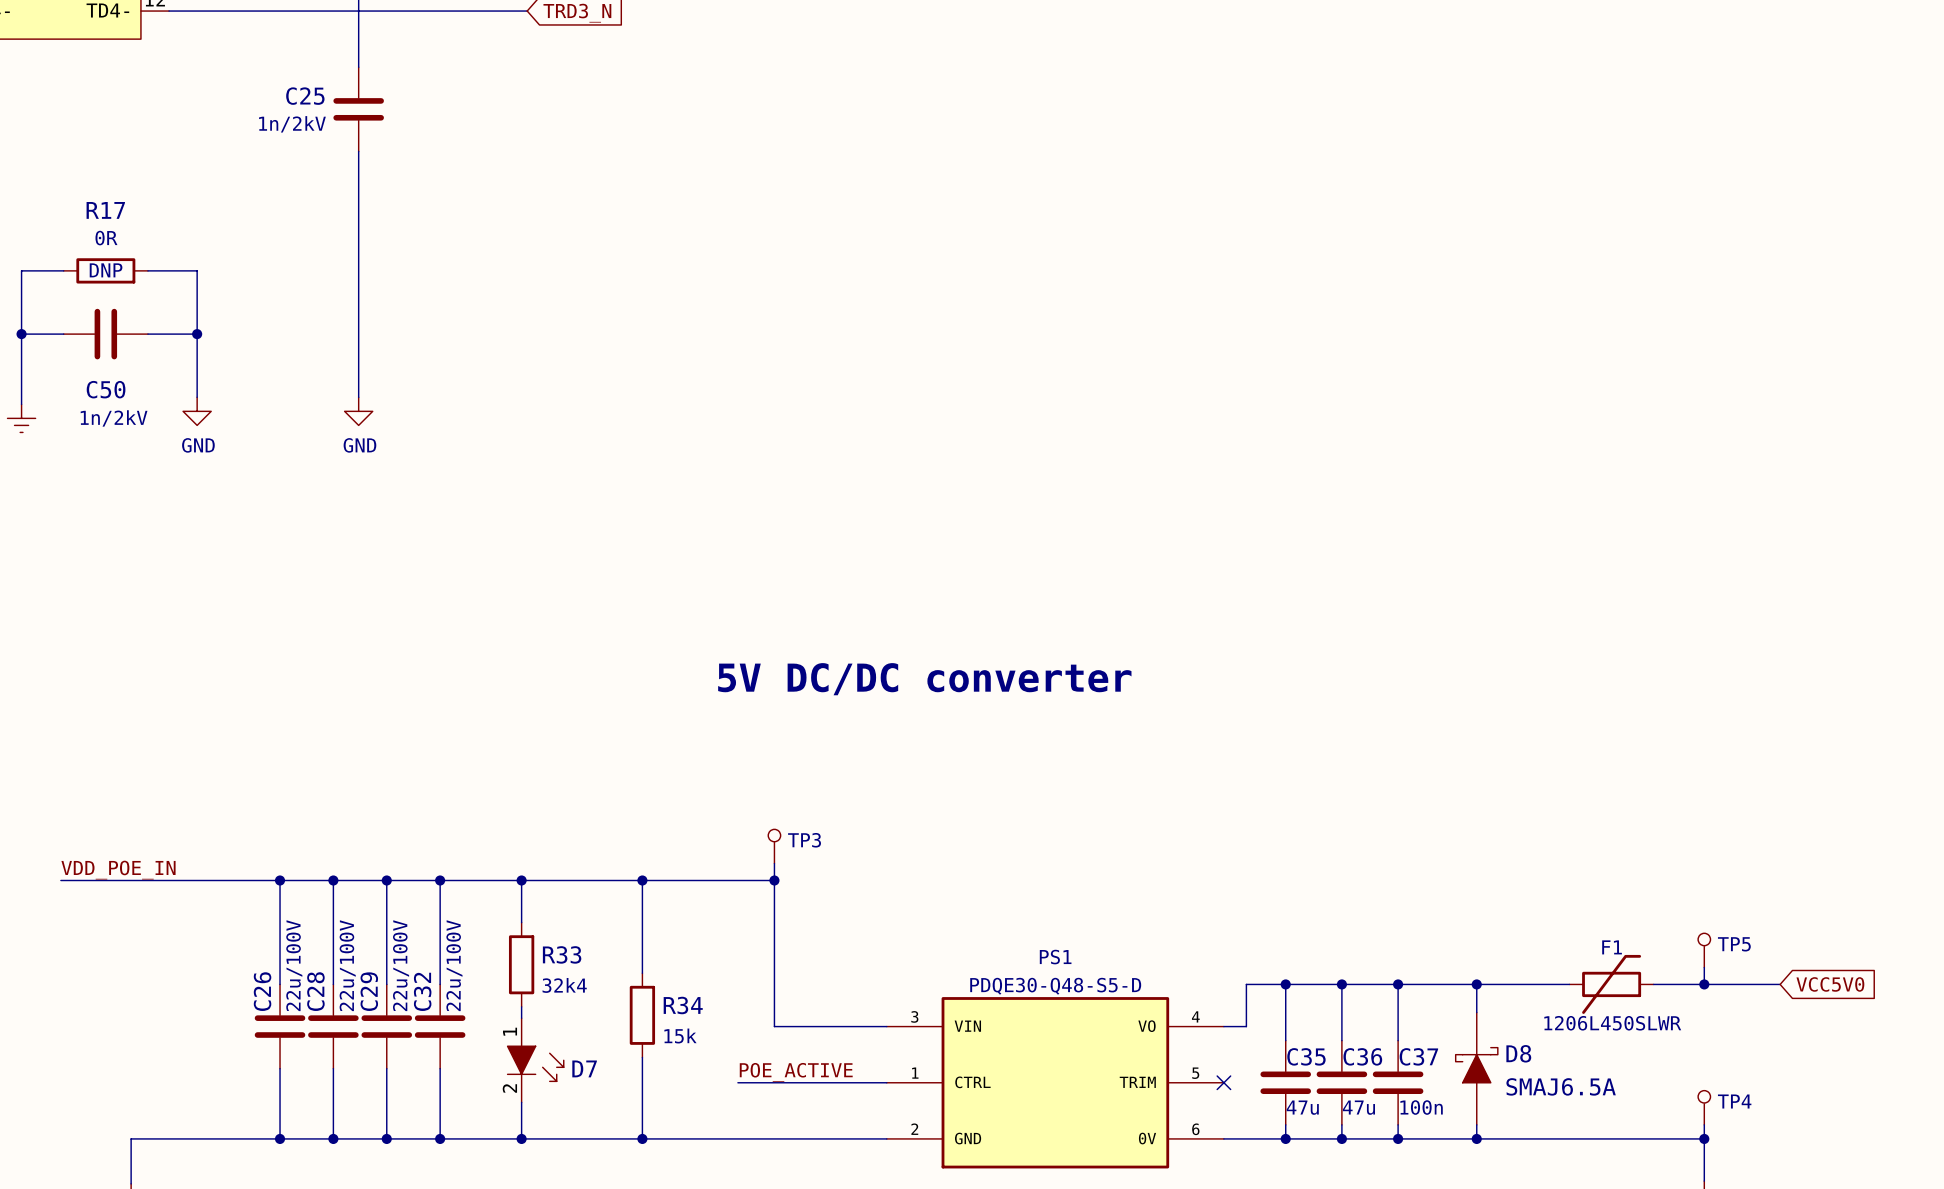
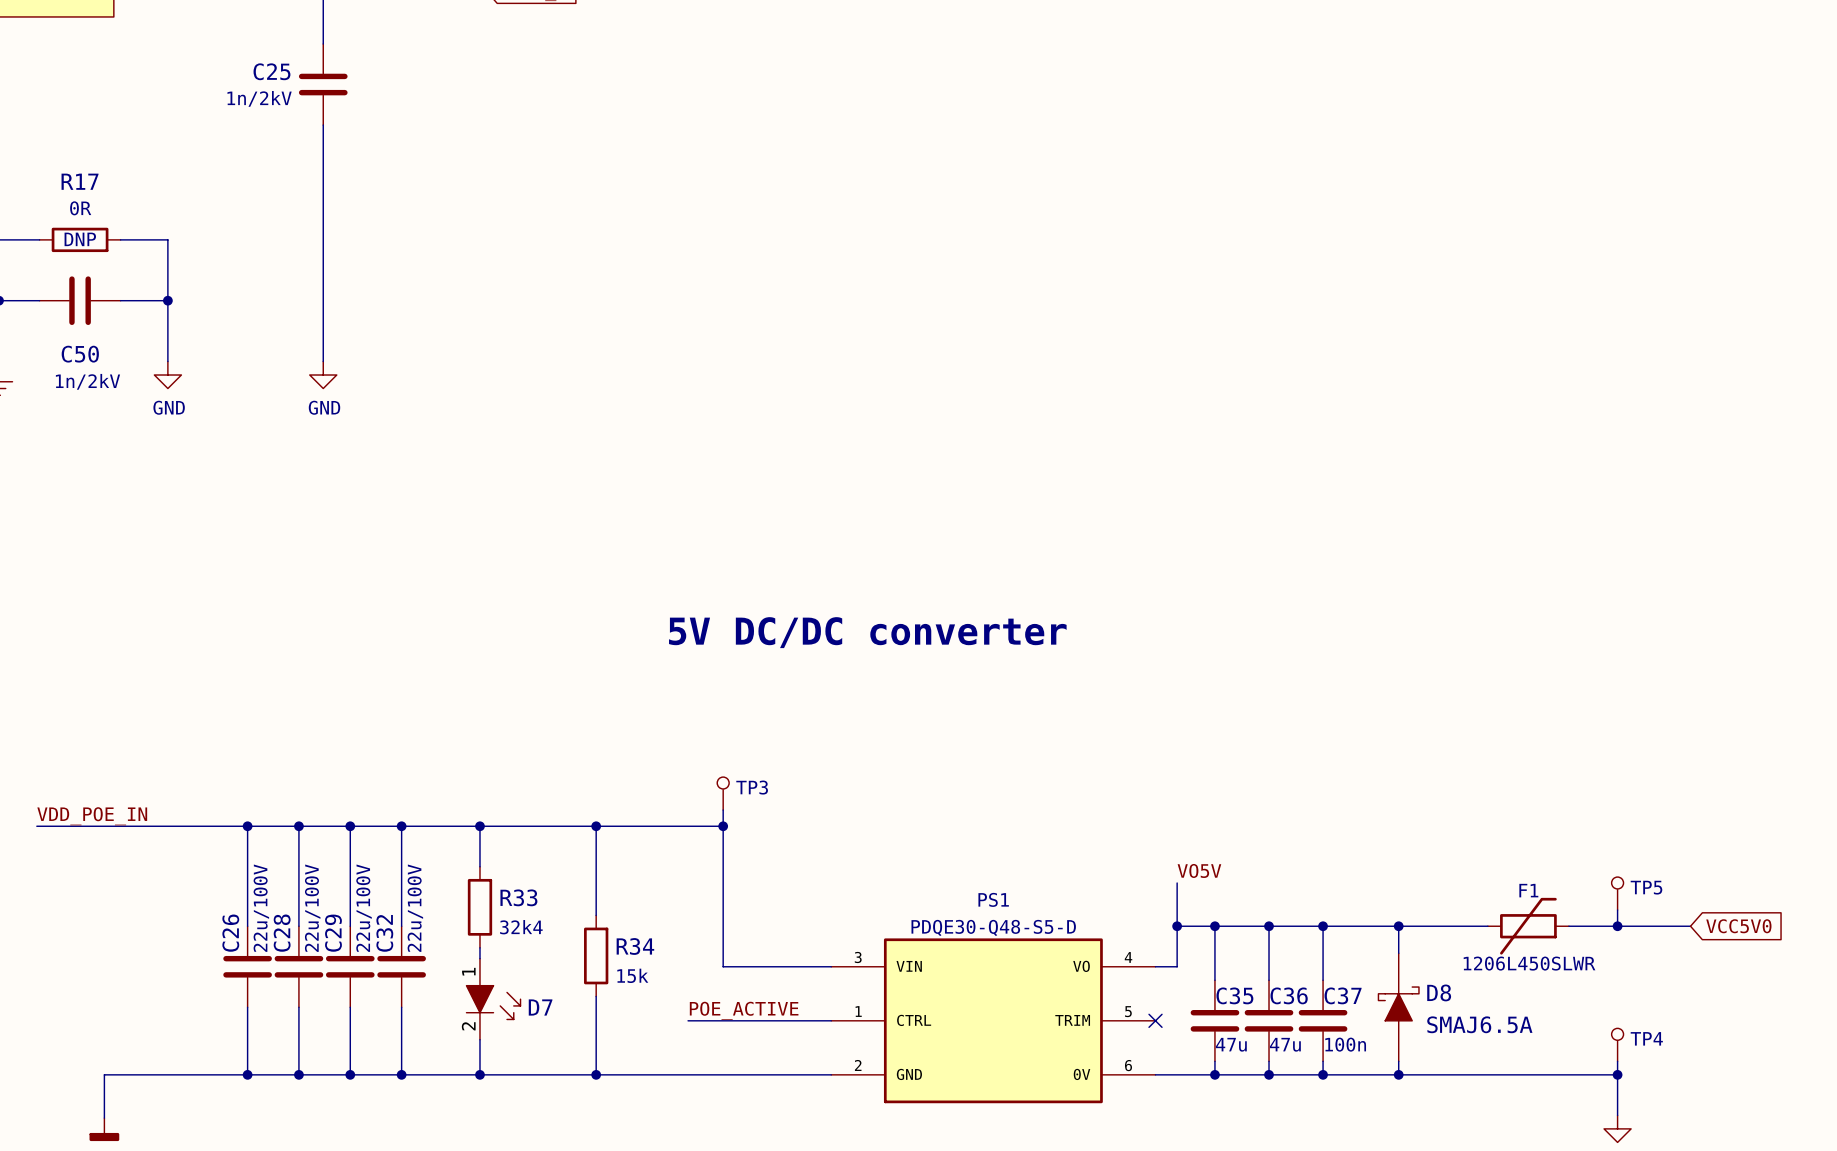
label: none -> VO5V (1199, 870)
wire: none -> (1177, 883) (1177, 926)
junction: none -> (1177, 926)

